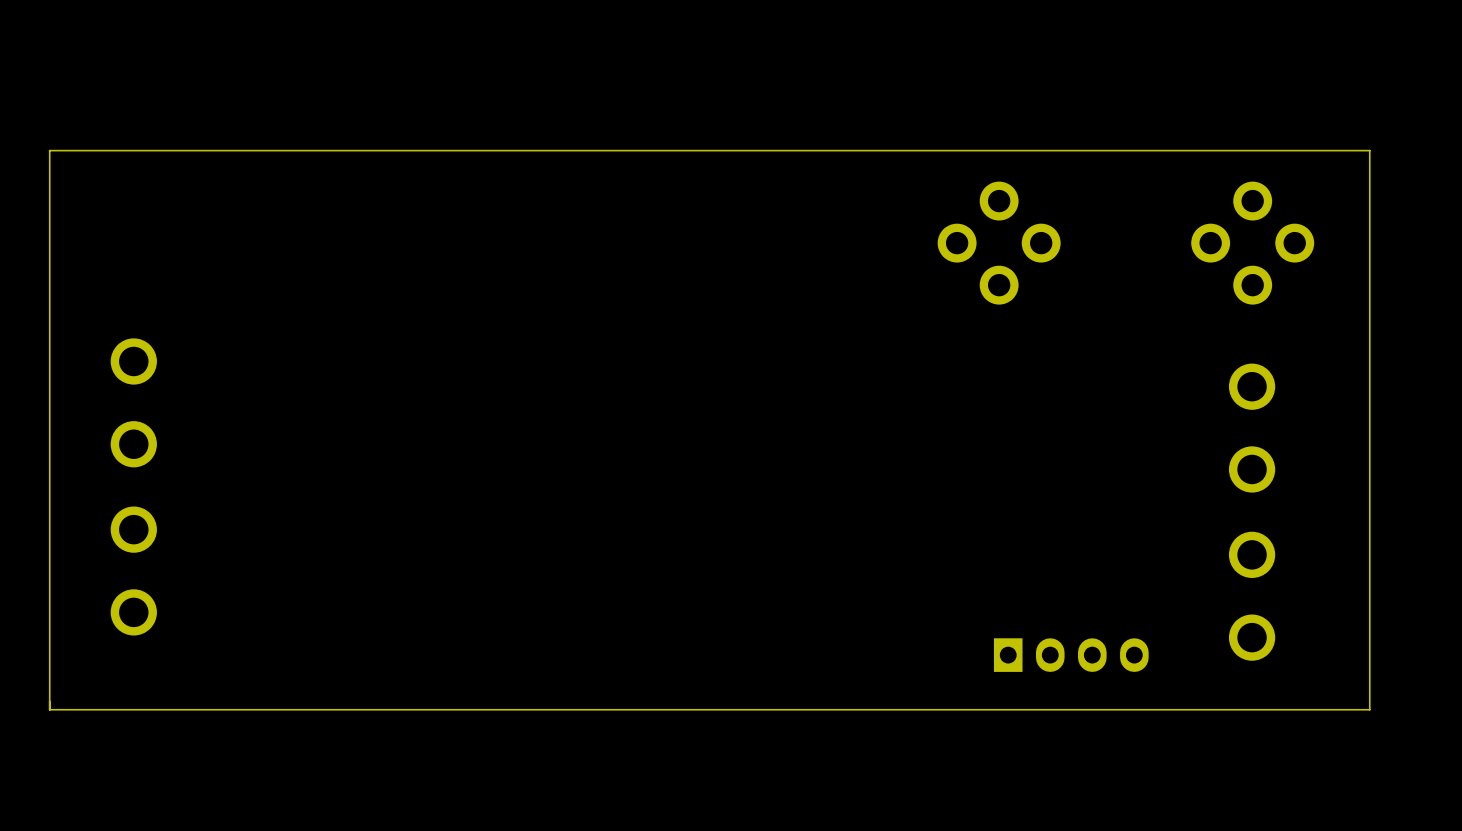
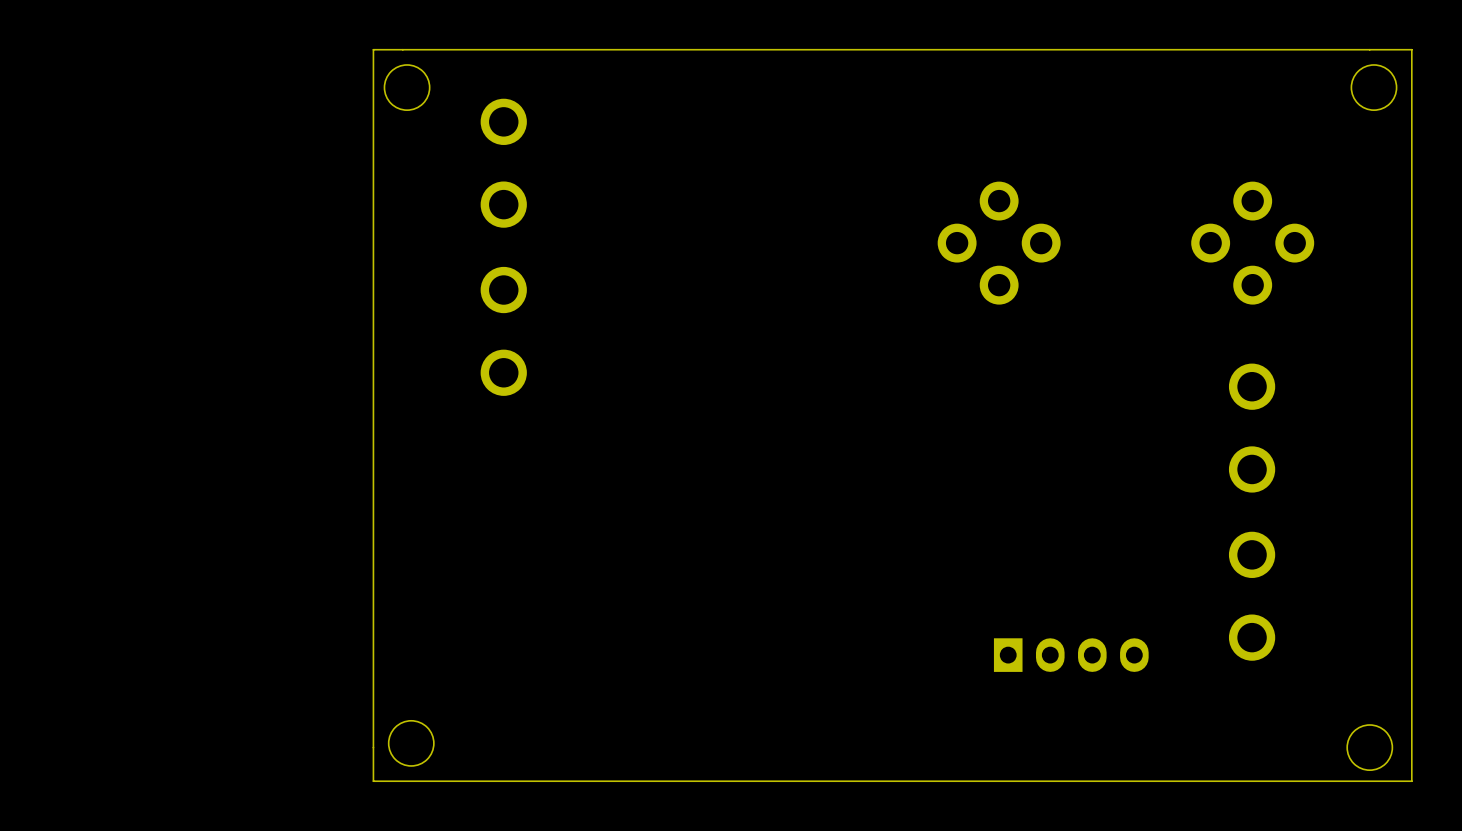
round board edge: none -> [383, 64, 431, 111]
round board edge: none -> [1350, 64, 1398, 111]
board edge: (1369, 150) (1369, 709) (49, 709) (49, 150) (1369, 150) -> (1411, 49) (1411, 781) (373, 781) (373, 49) (1411, 49)
part: none -> (503, 247)
part: (133, 486) -> none
round board edge: none -> [387, 719, 435, 767]
round board edge: none -> [1346, 724, 1394, 772]

